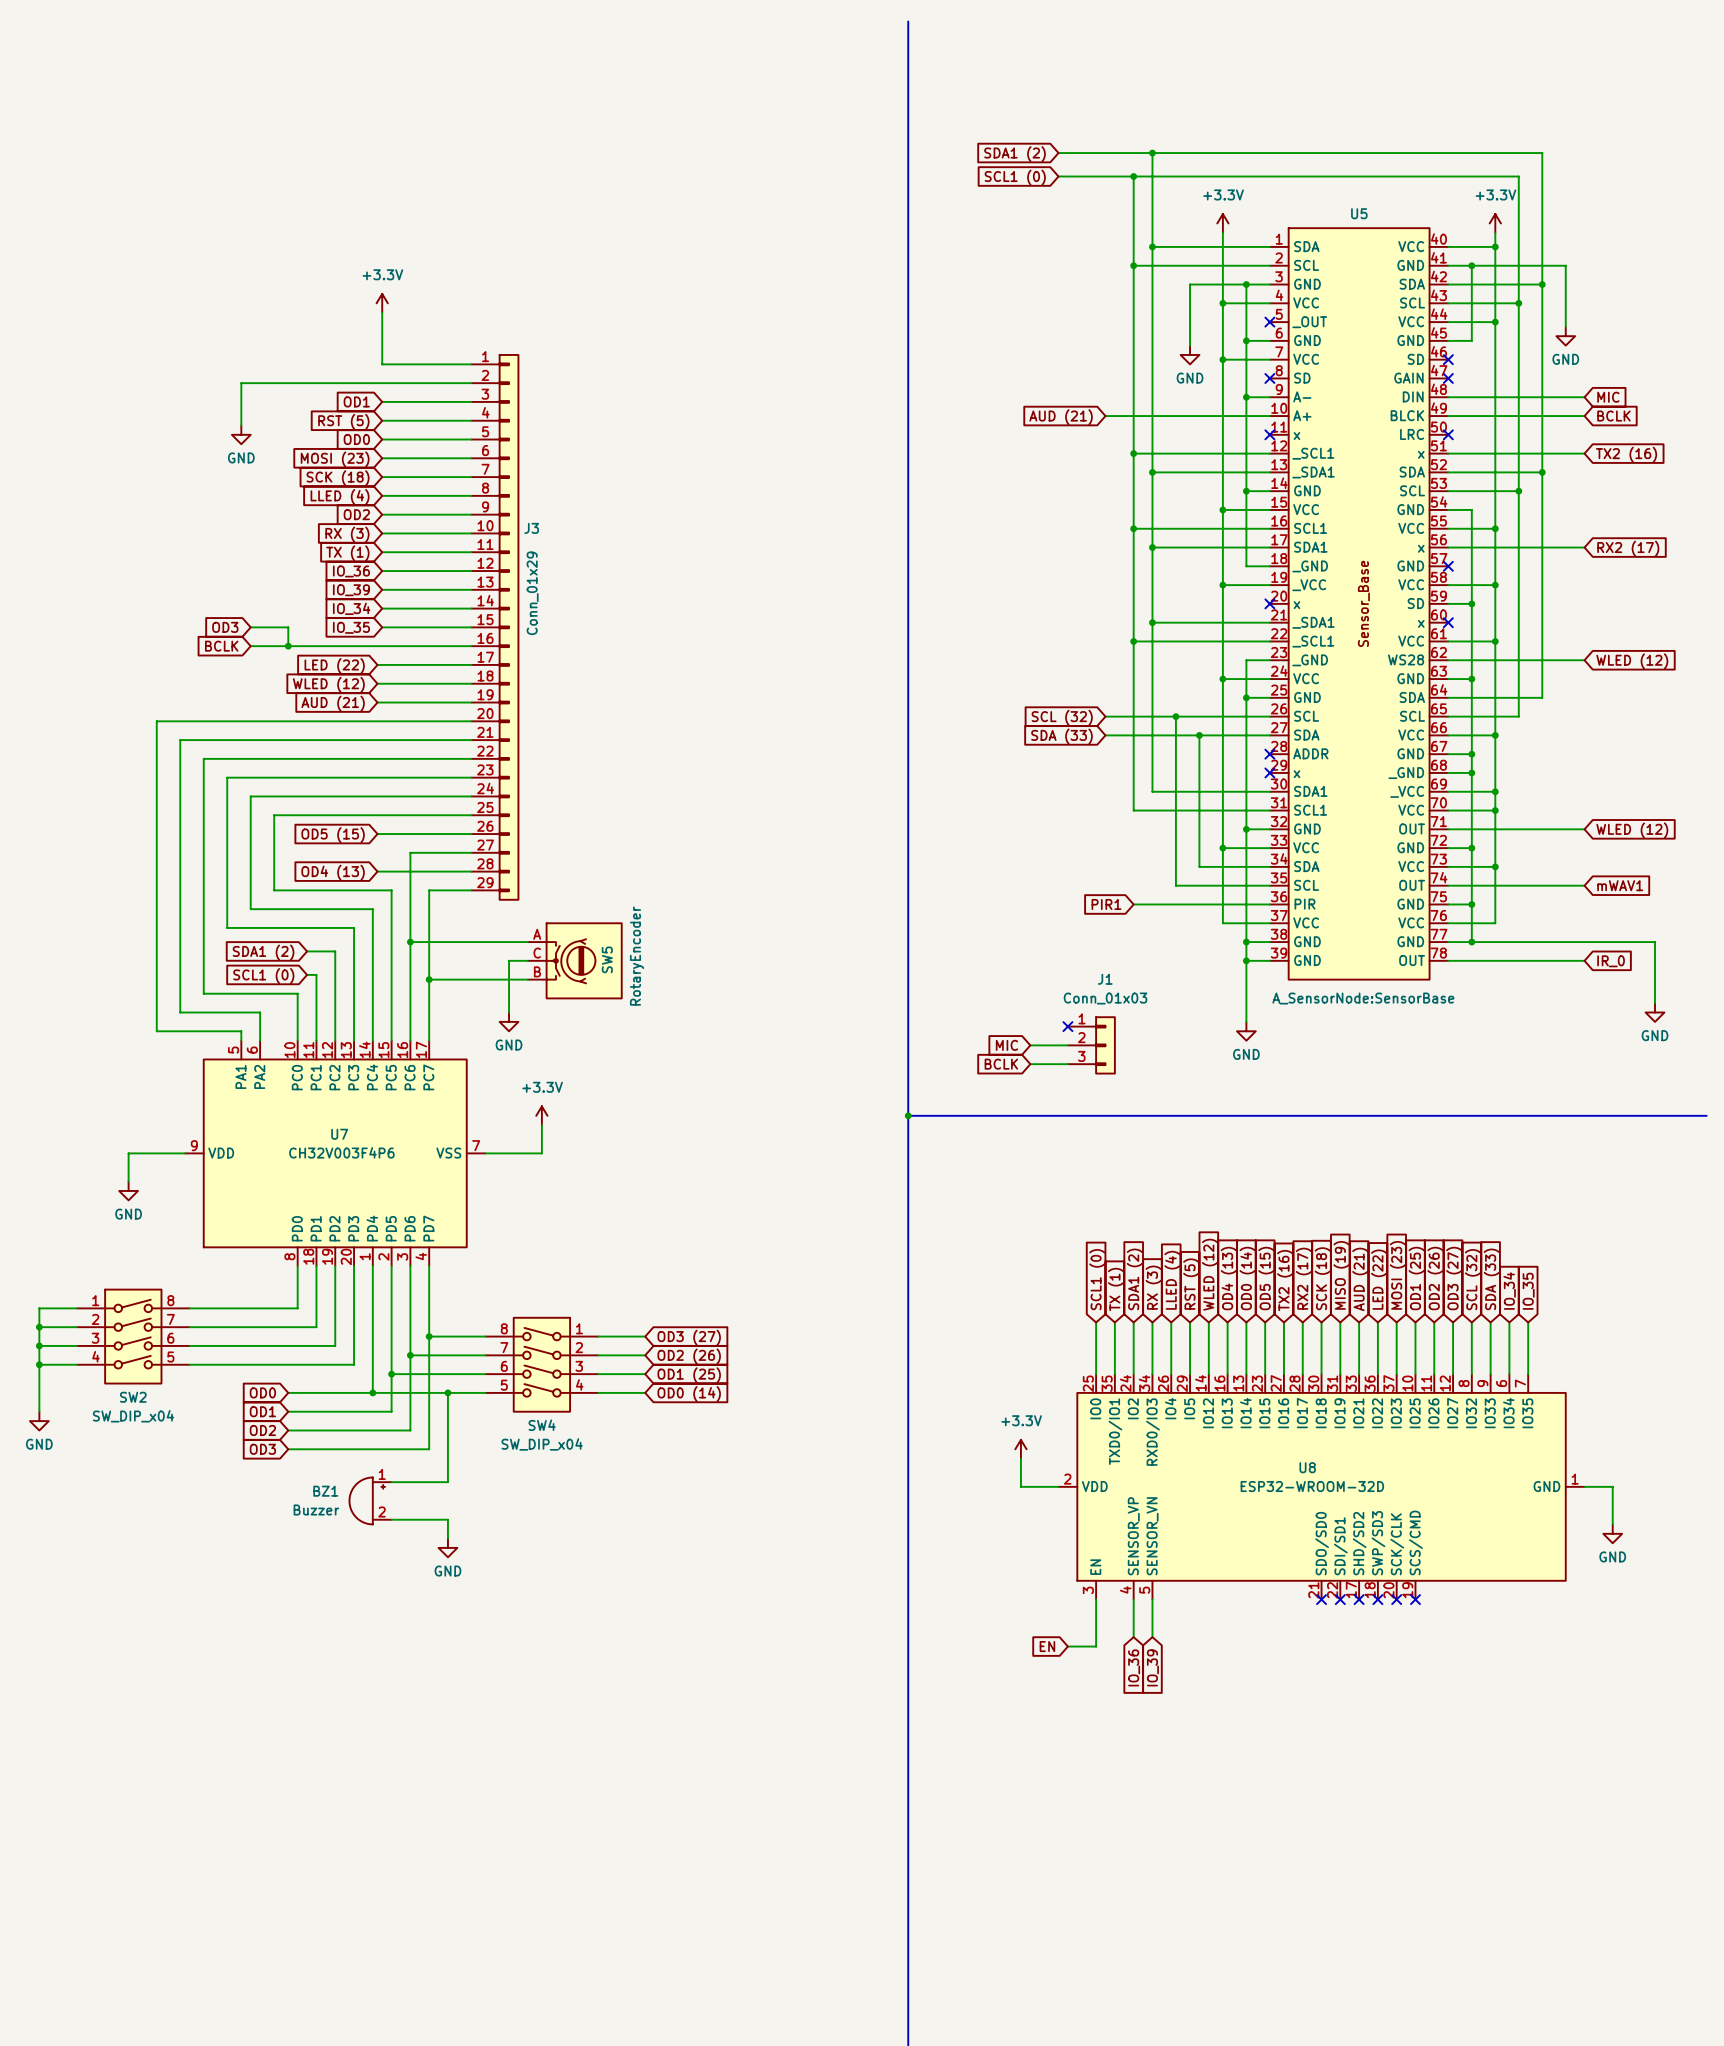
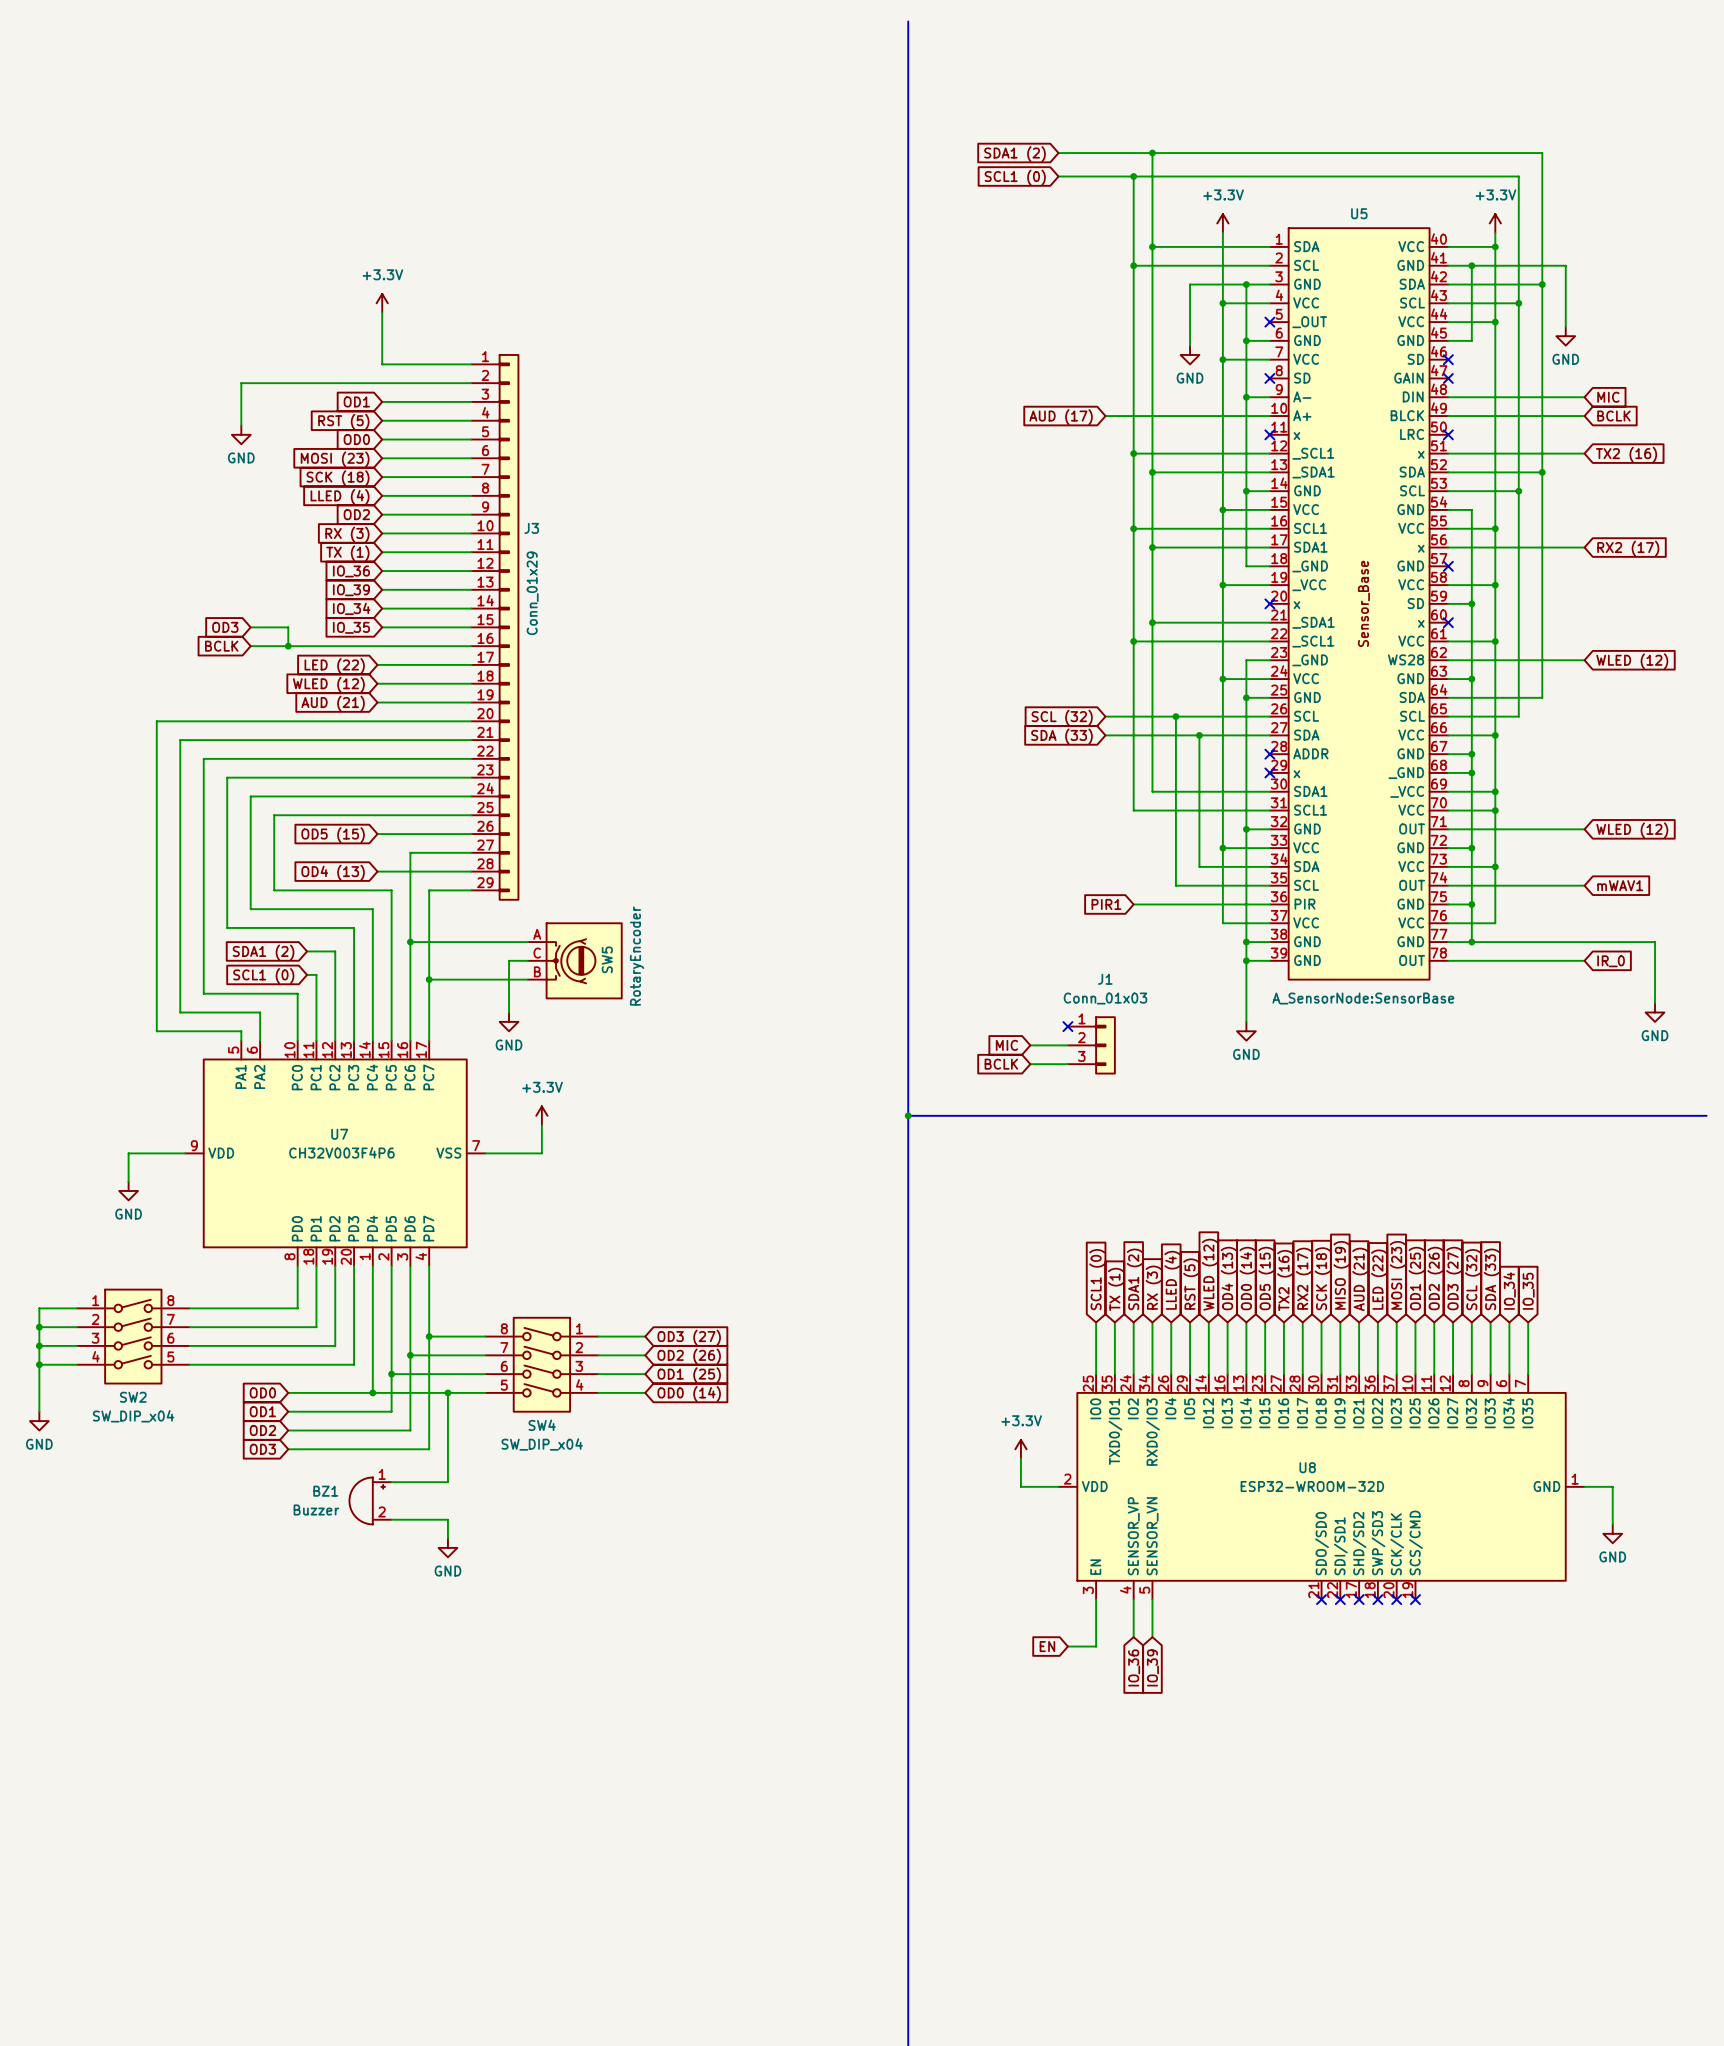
global label: AUD (21) (1061, 417) -> AUD (17) (1061, 417)

